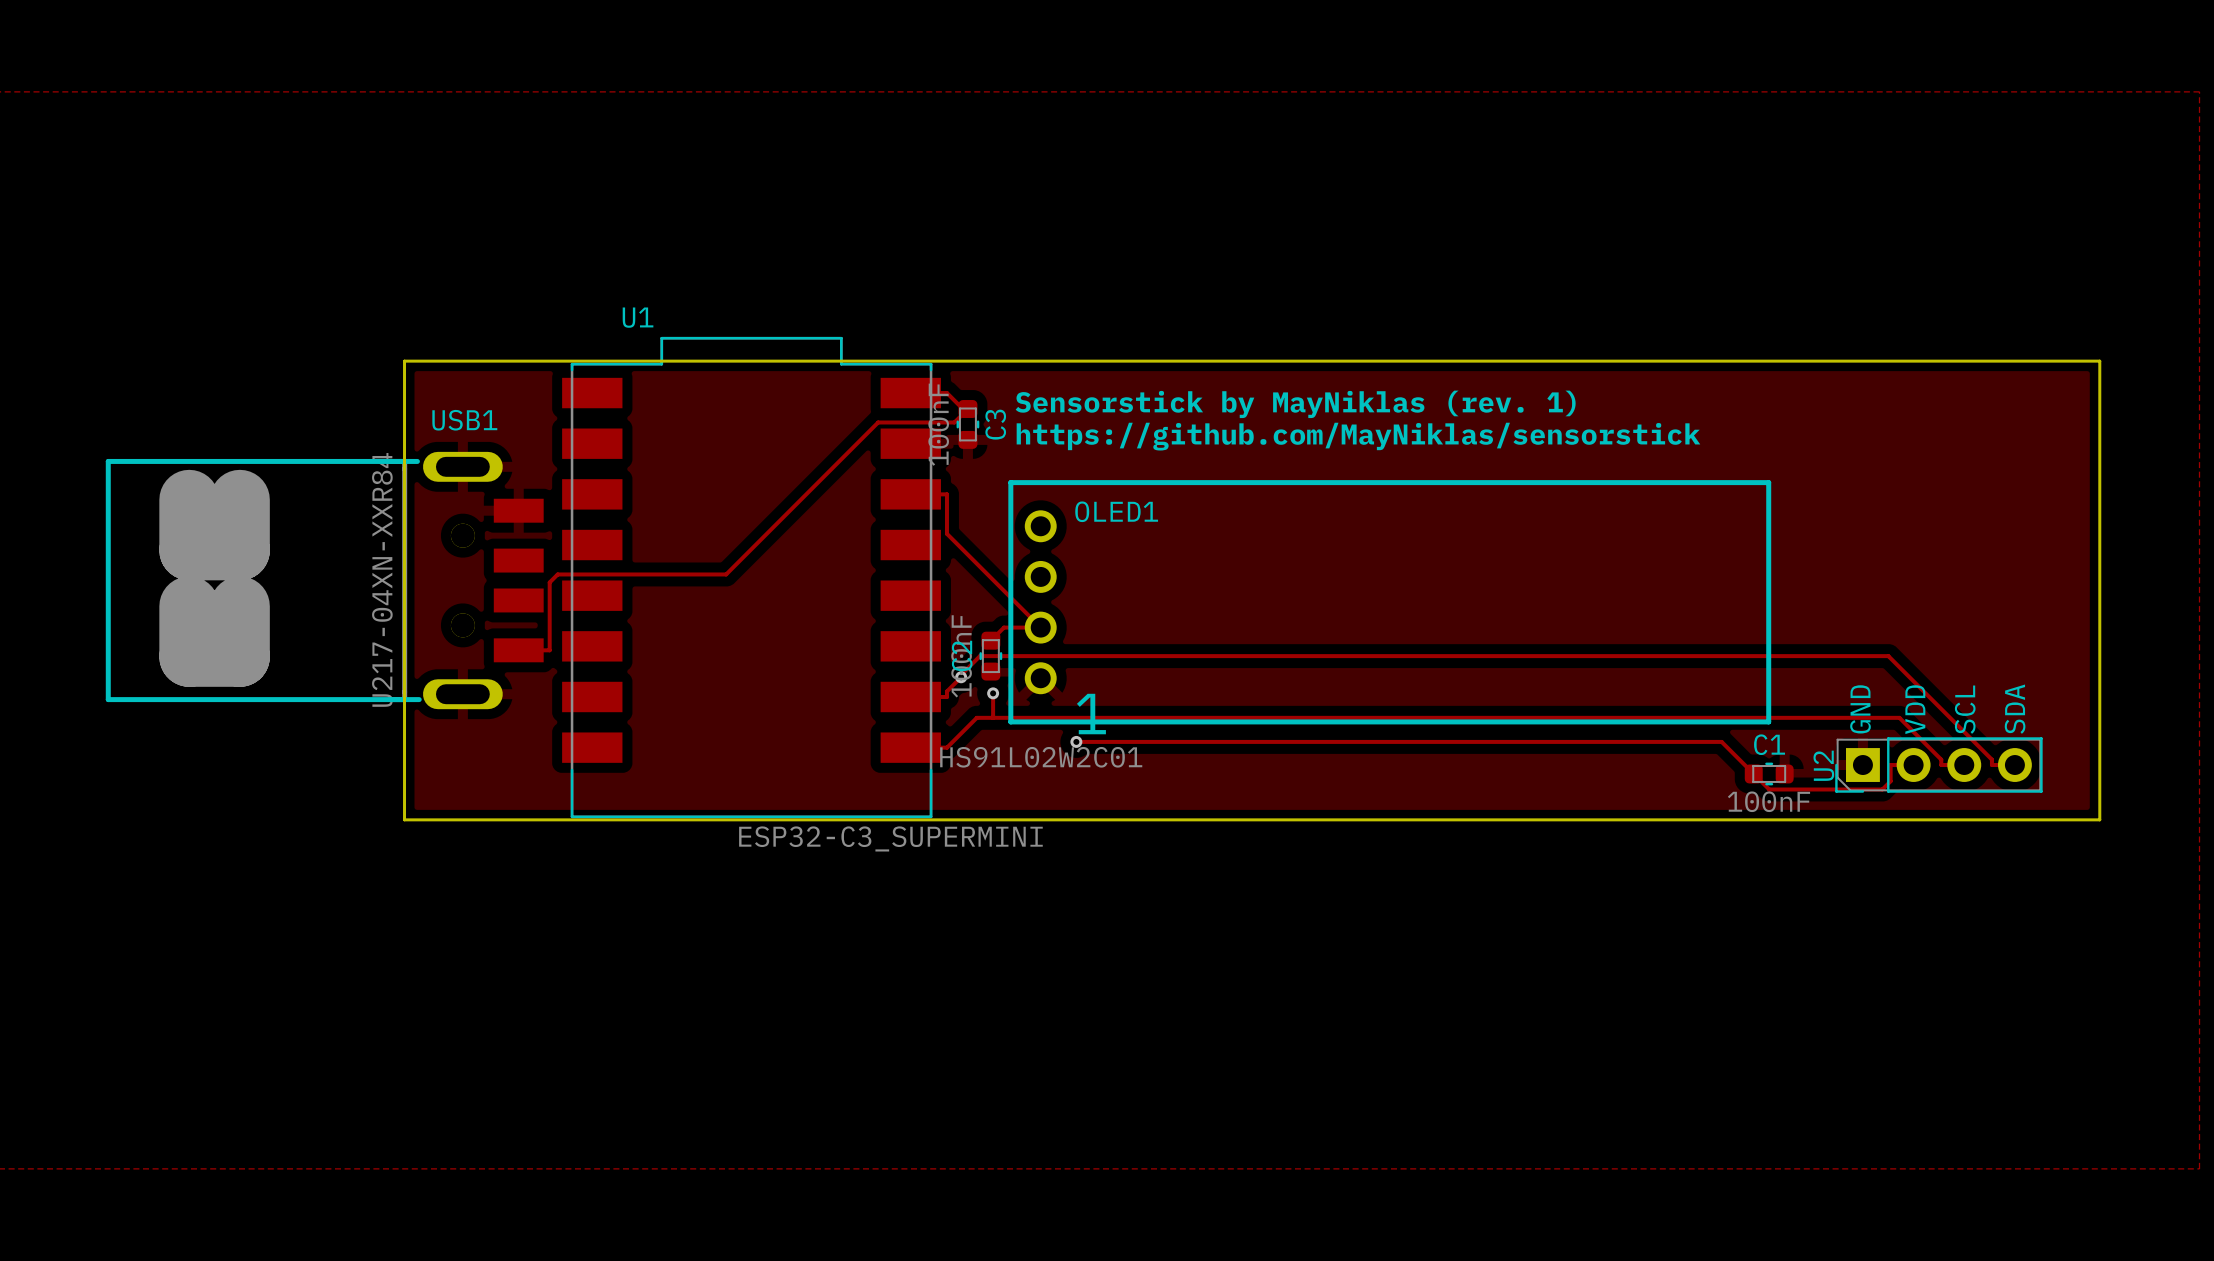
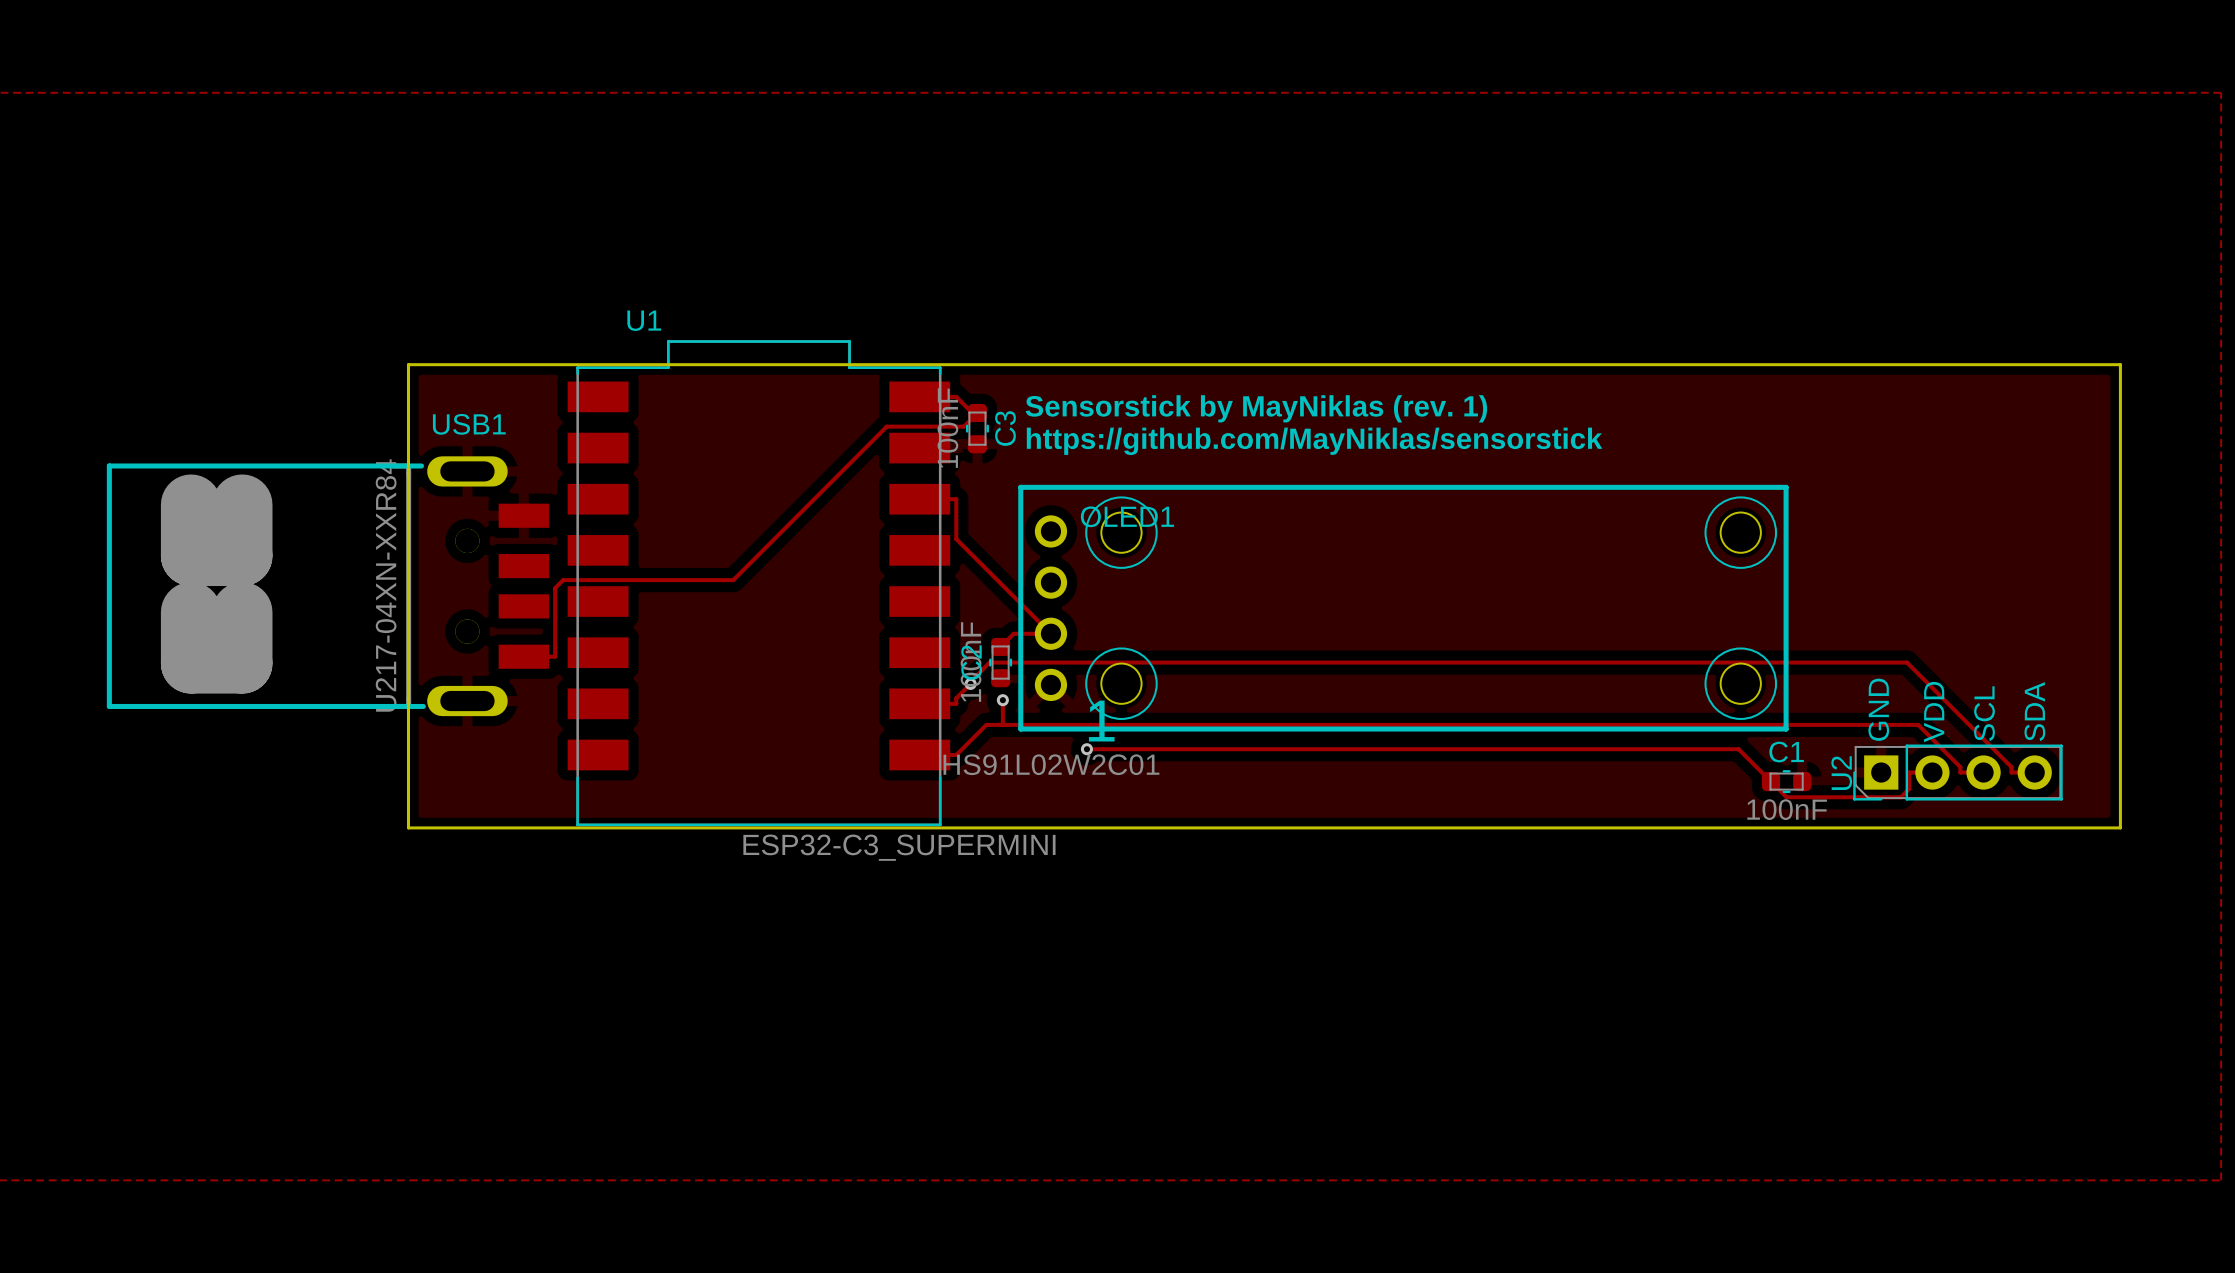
OLED1 footprint: [1008, 480, 1772, 725] -> [1018, 484, 1789, 732]

